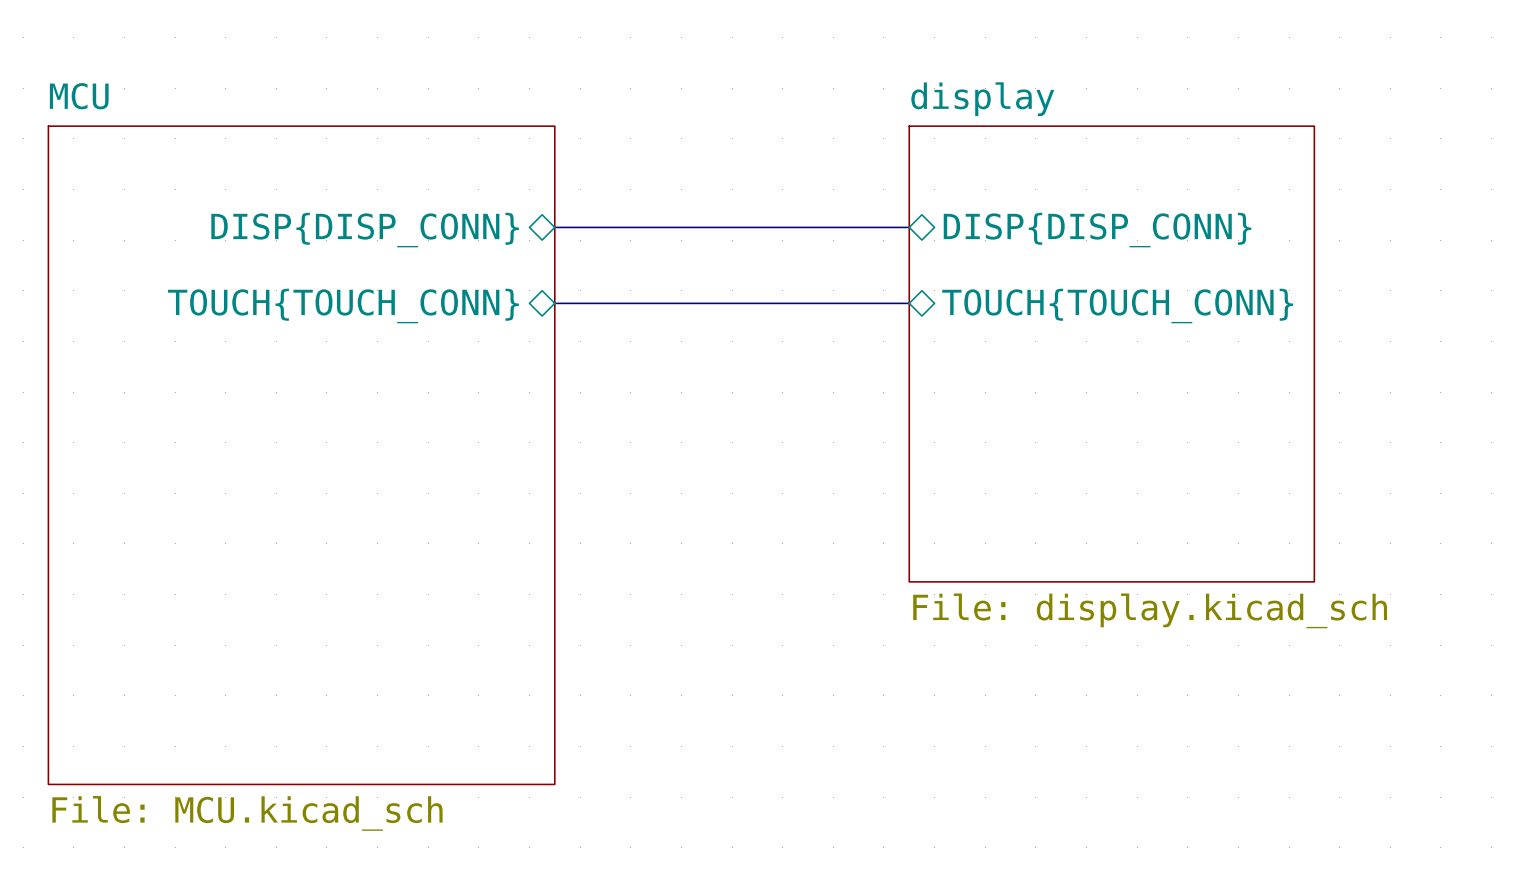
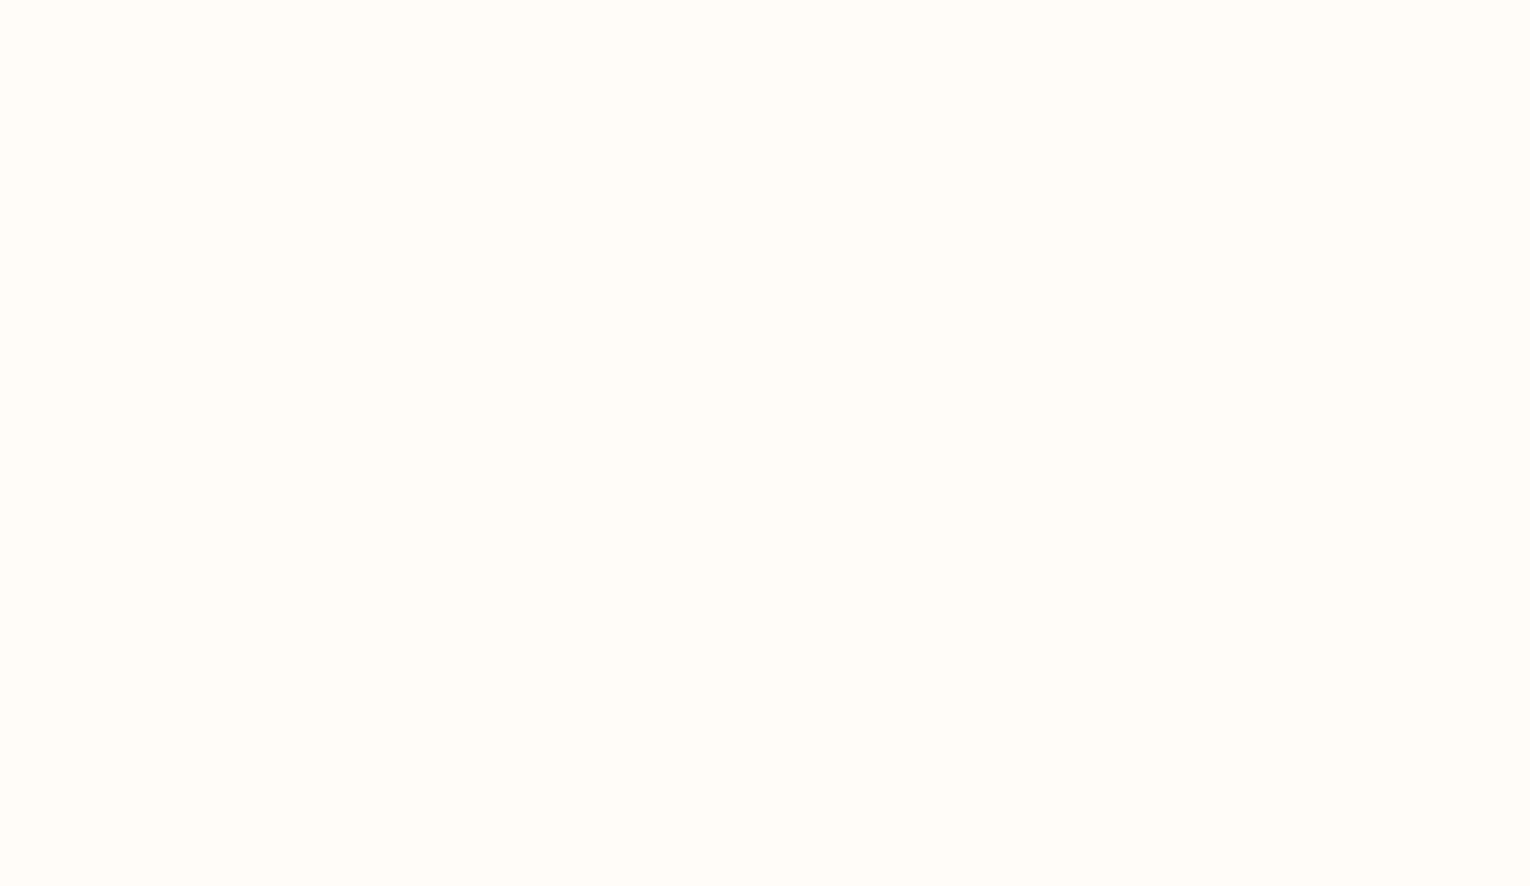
bus: (554, 227) (909, 227) -> none
sheet pin: DISP{DISP_CONN} (365, 230) -> none
sheet pin: DISP{DISP_CONN} (1097, 230) -> none
bus: (554, 303) (909, 303) -> none
sheet pin: TOUCH{TOUCH_CONN} (343, 305) -> none
sheet pin: TOUCH{TOUCH_CONN} (1117, 305) -> none
sheet display: File: display.kicad_sch (1111, 354) -> none
sheet MCU: File: MCU.kicad_sch (301, 455) -> none

